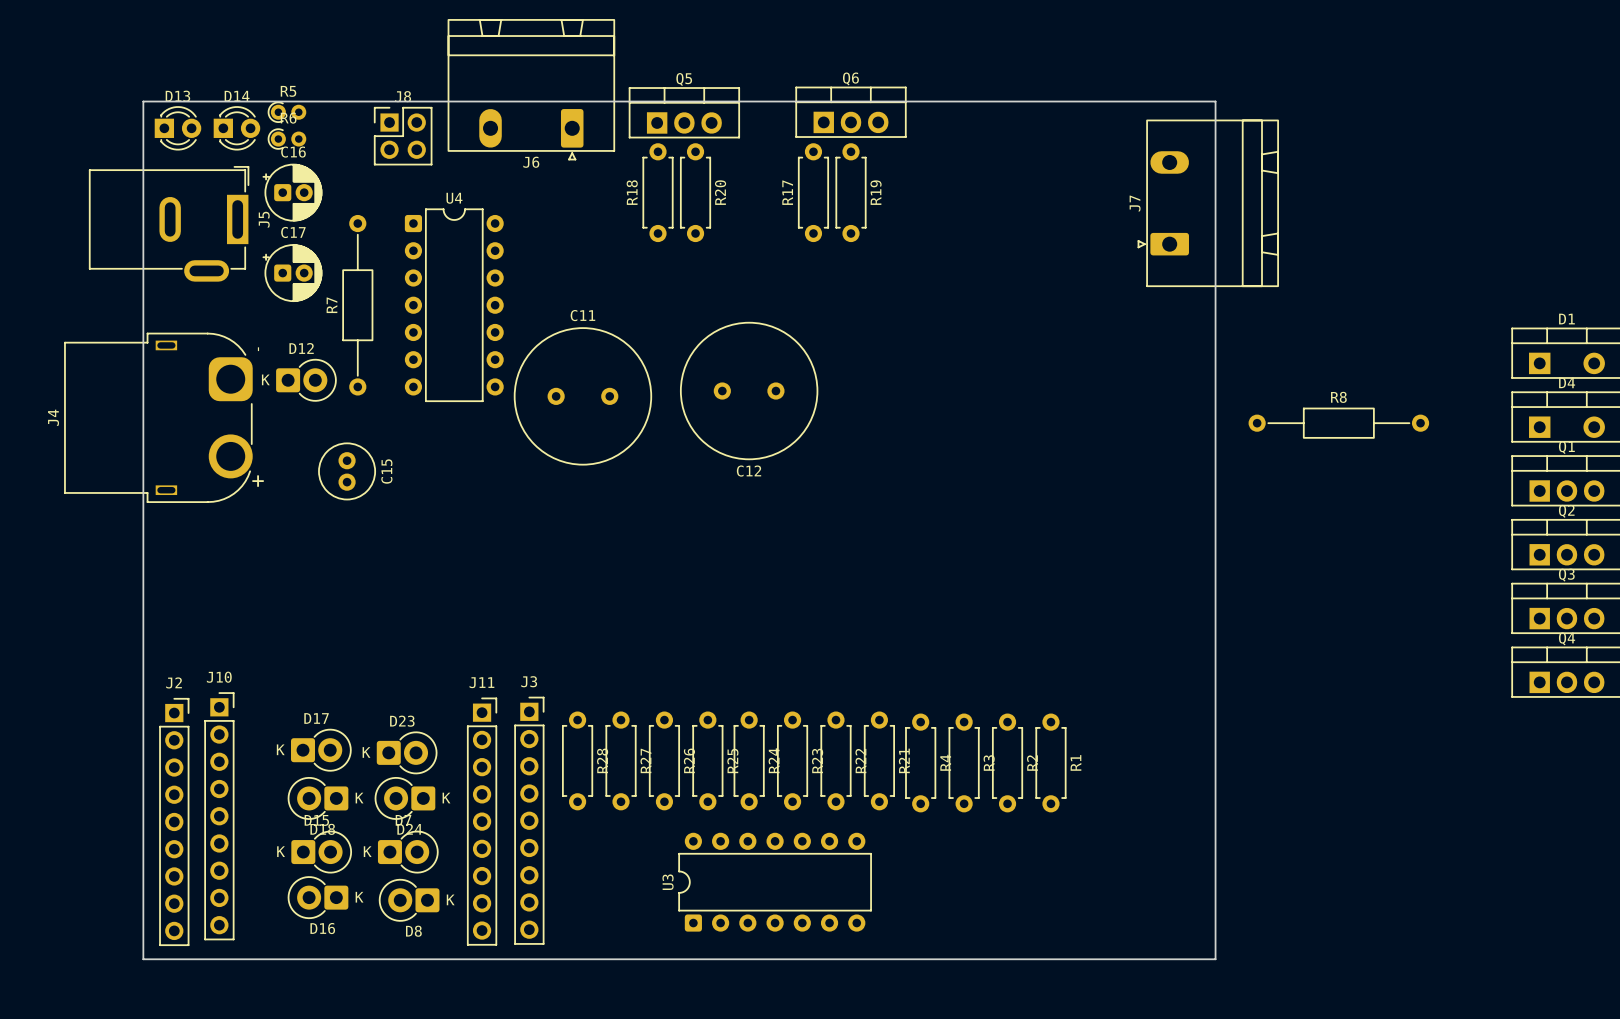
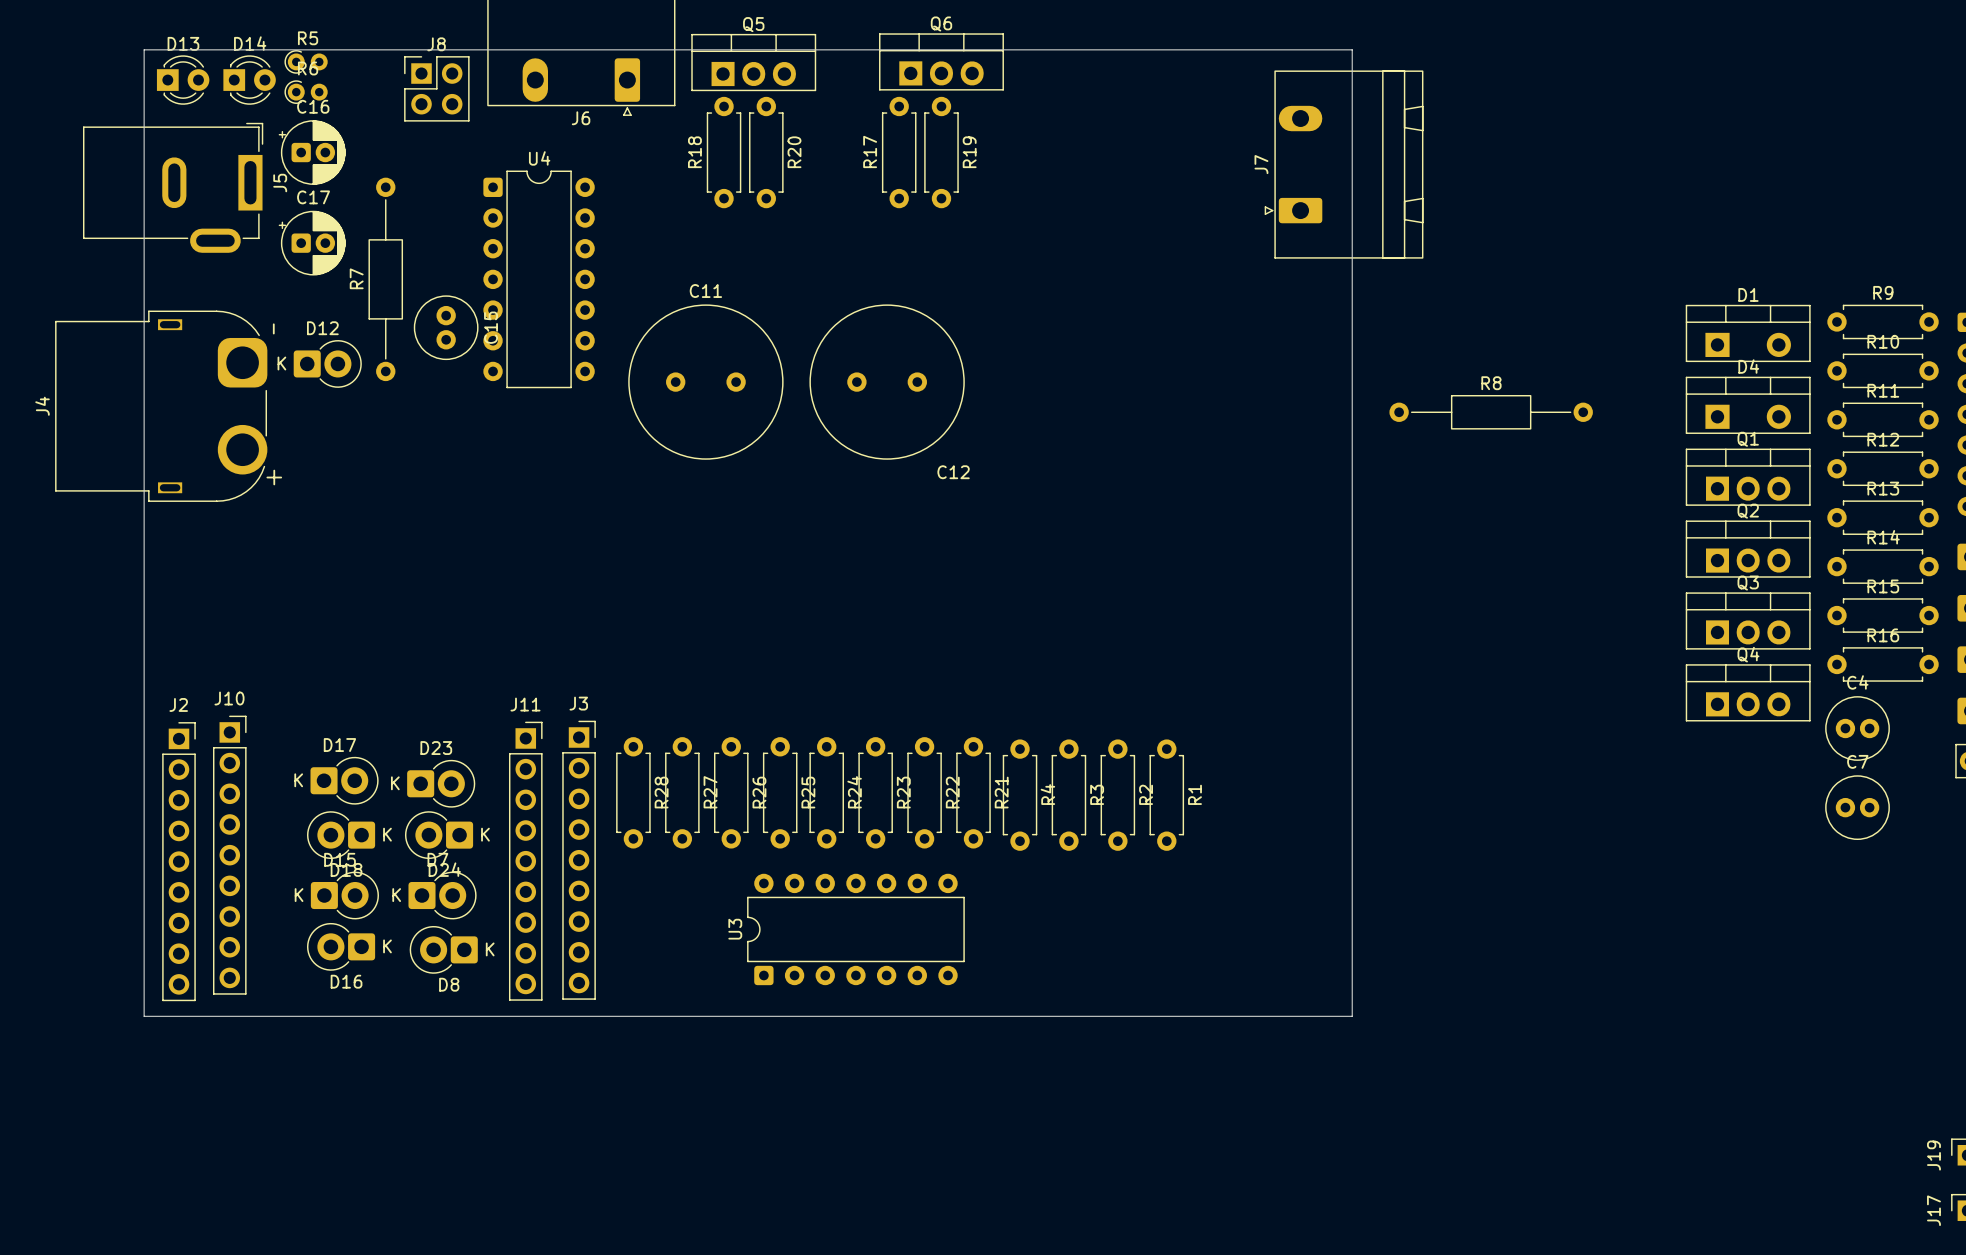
U4 position: (454, 305) -> (539, 279)
C12 position: (749, 391) -> (887, 382)
C11 position: (582, 396) -> (705, 382)
C15 position: (347, 471) -> (446, 327)
C12 name position: C12 (749, 471) -> C12 (953, 472)

